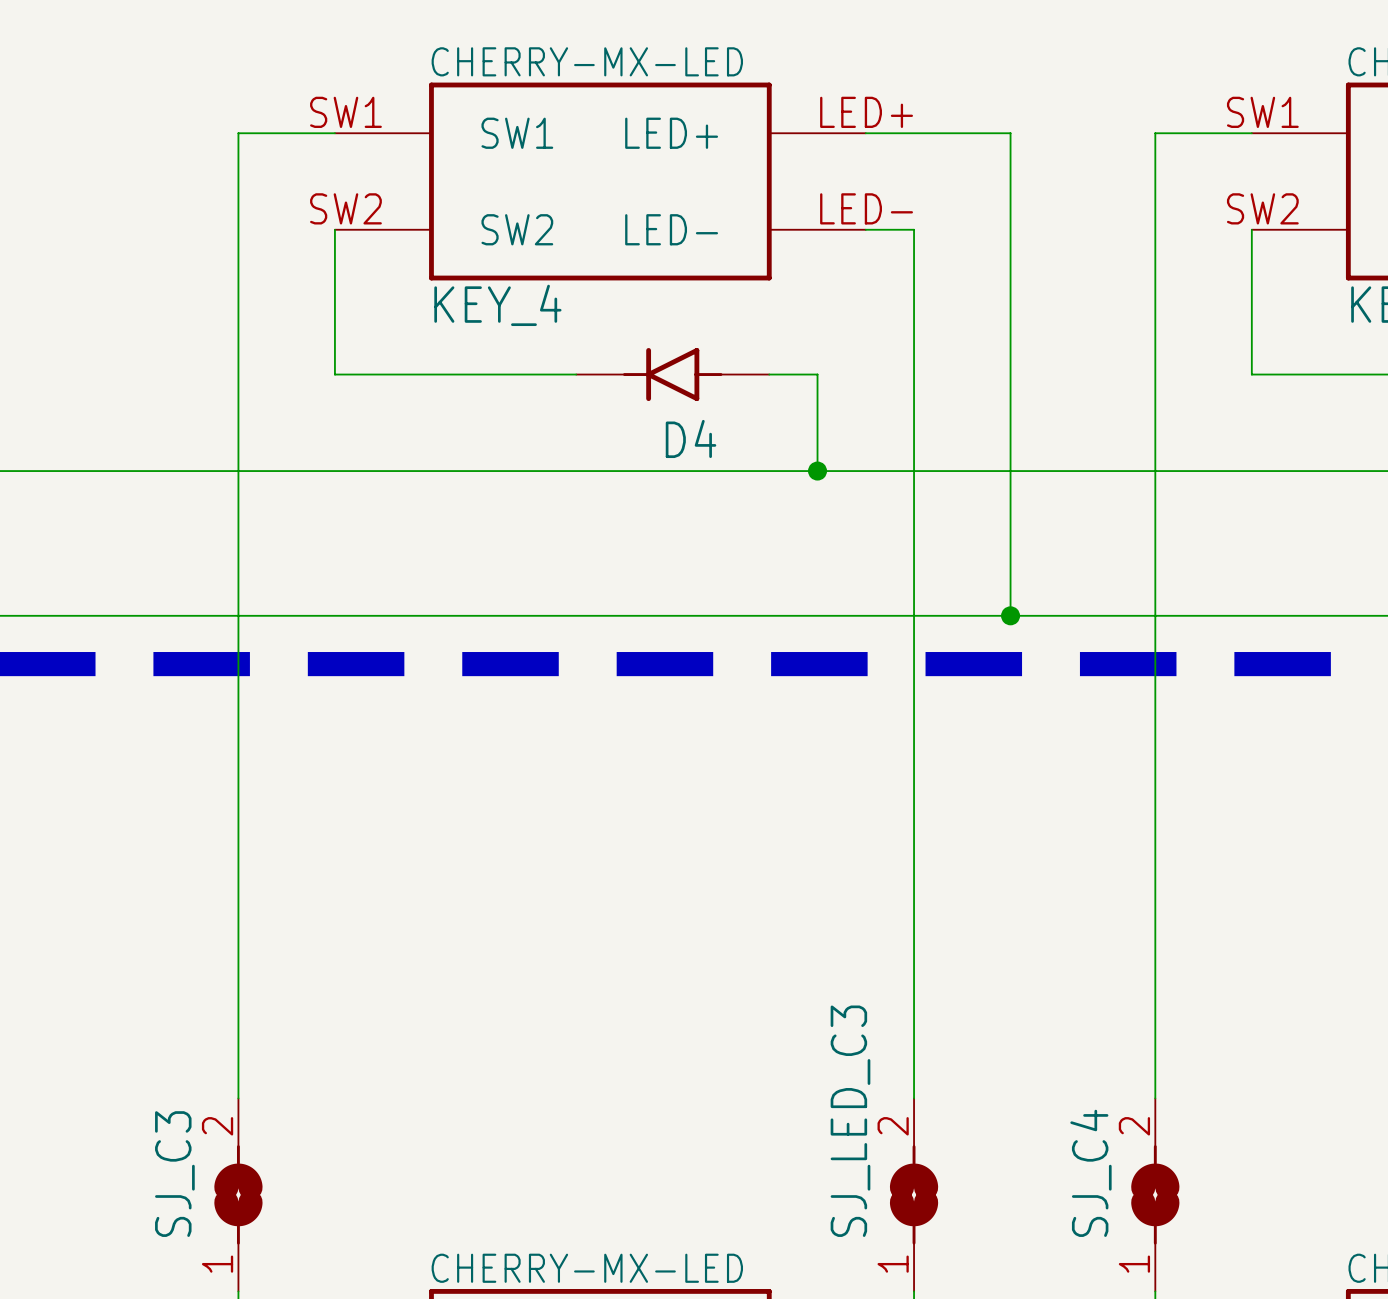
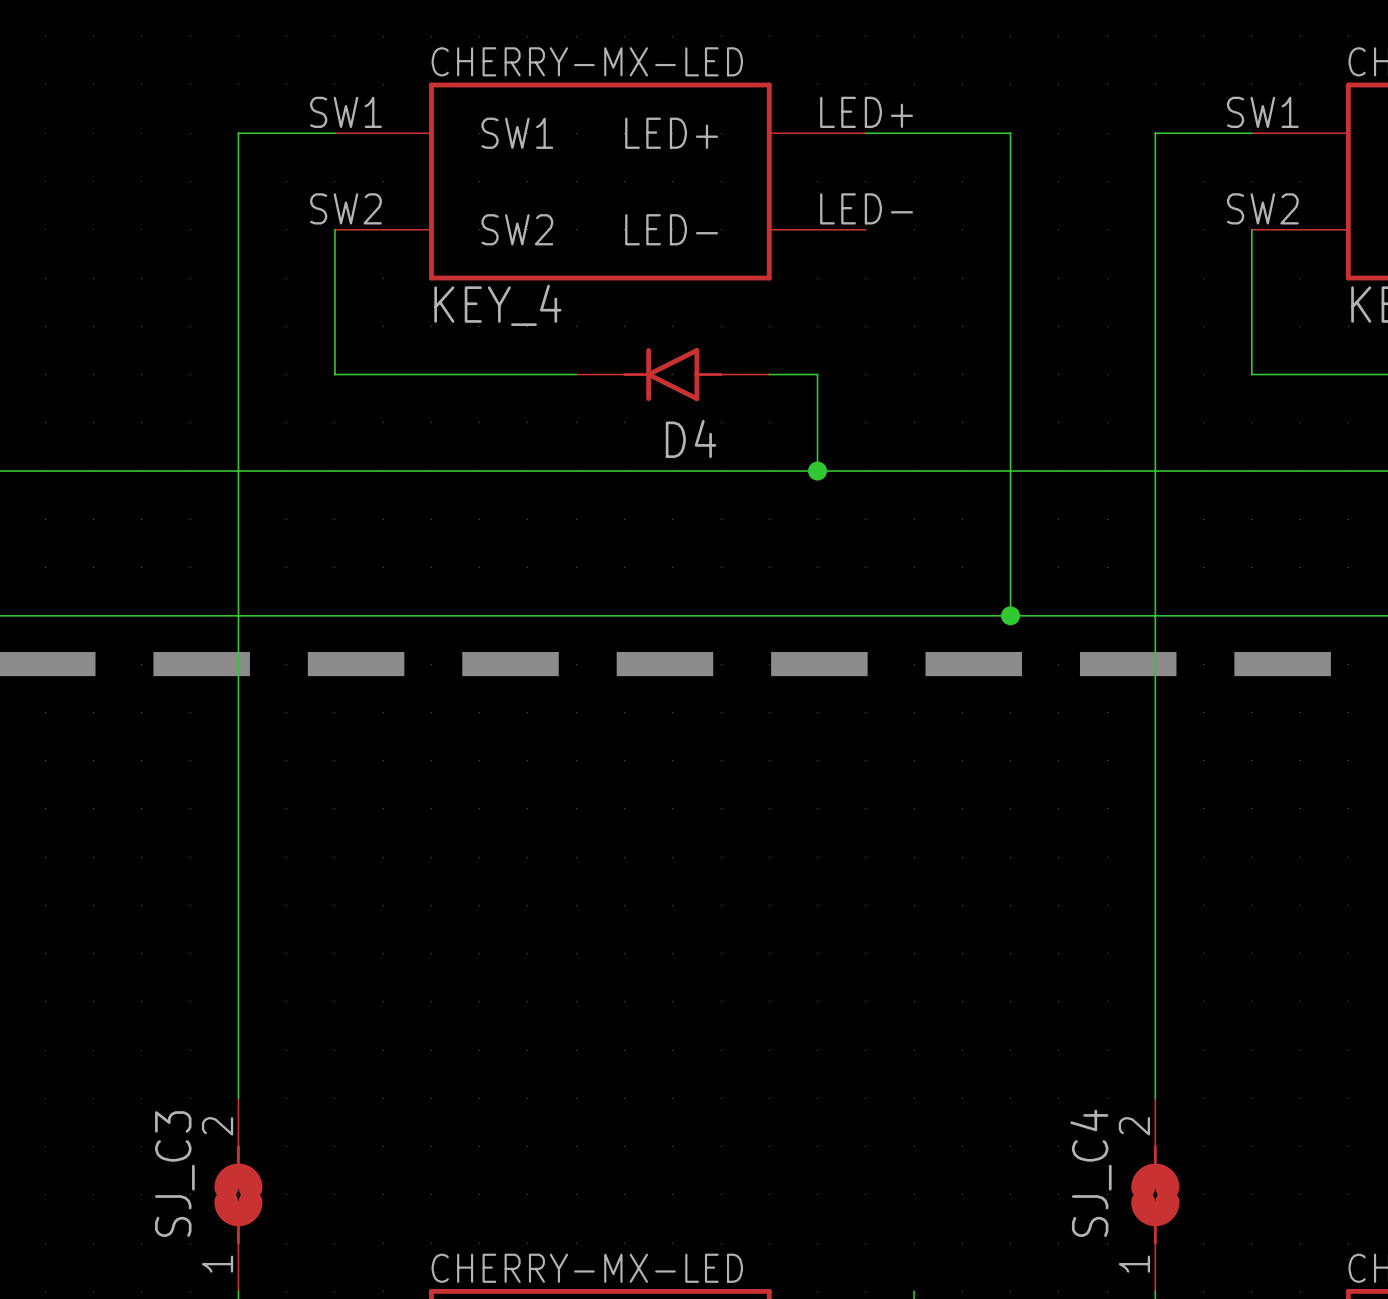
wire: (865, 229) (914, 229) (914, 1098) -> none
SJ_LED_C3: (914, 1194) -> none

